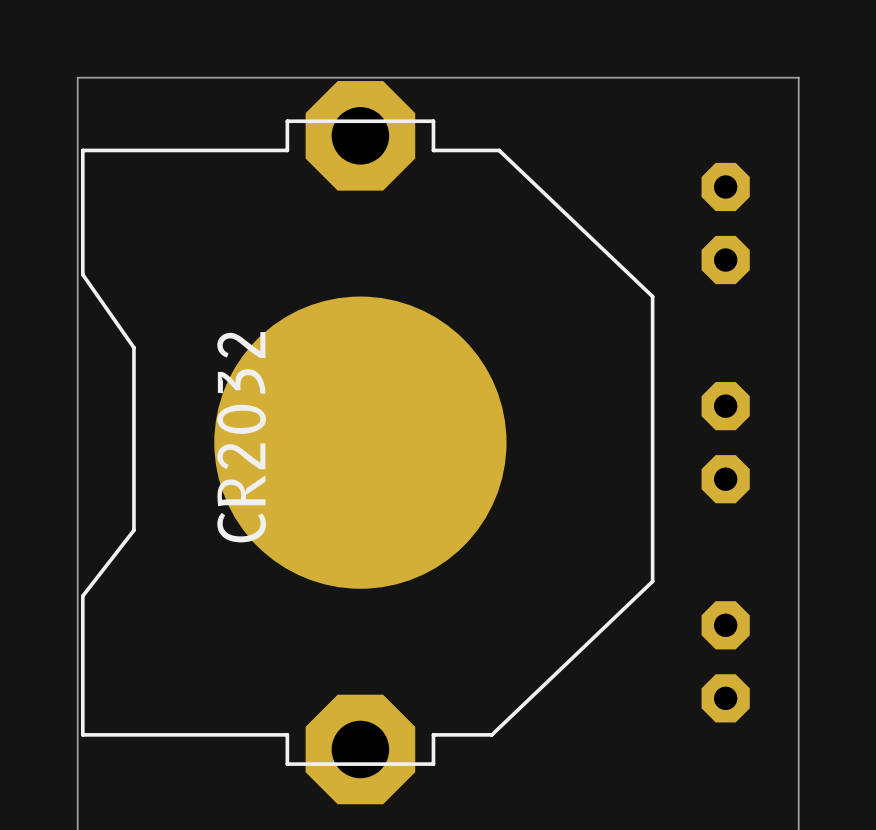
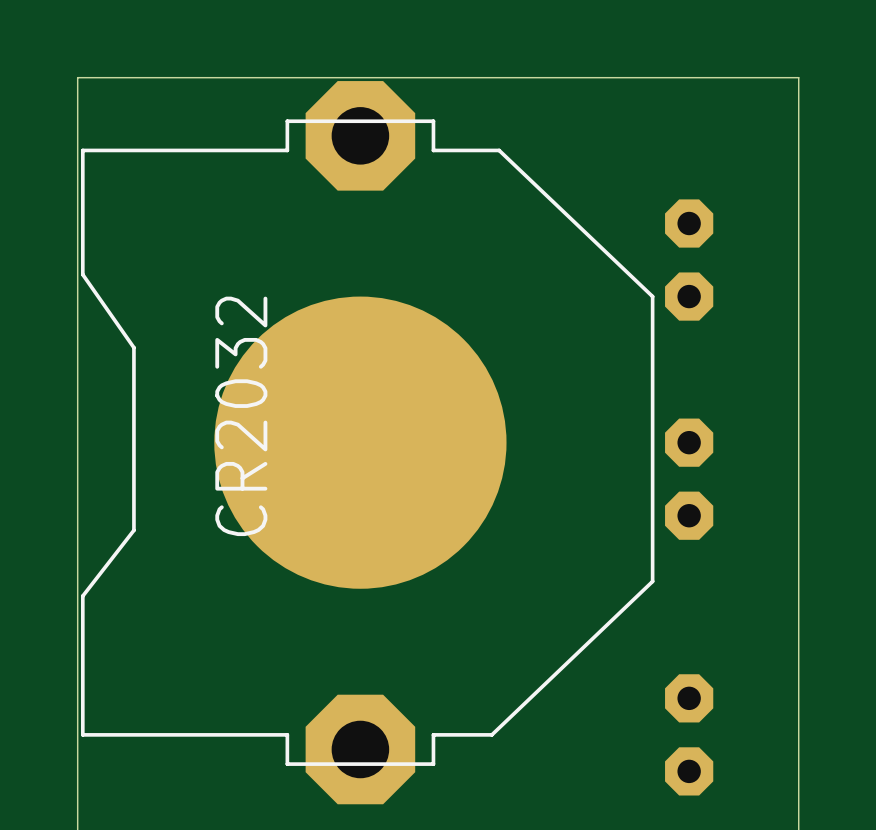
part position: (725, 223) -> (689, 260)
part position: (725, 442) -> (689, 479)
part position: (725, 661) -> (689, 734)

